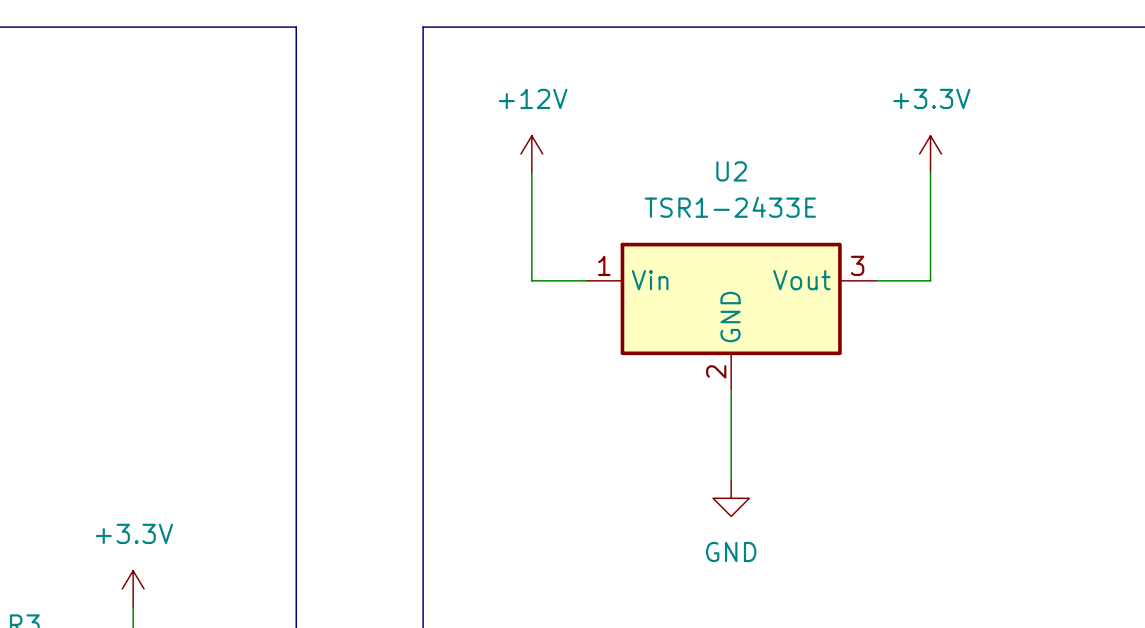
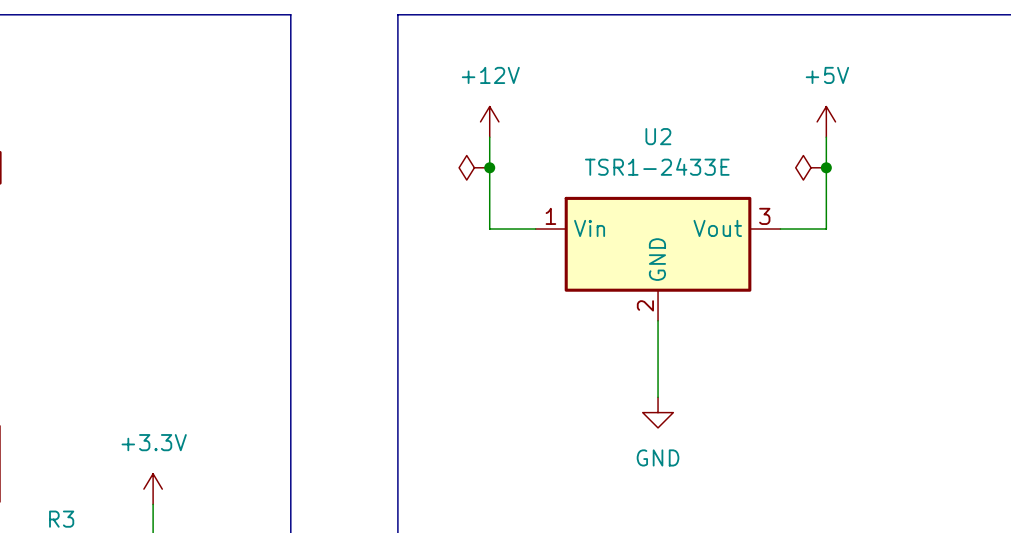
power symbol: +3.3V (930, 153) -> +5V (826, 121)
power symbol: none -> (474, 167)
junction: none -> (489, 167)
power symbol: none -> (811, 167)
junction: none -> (826, 167)

